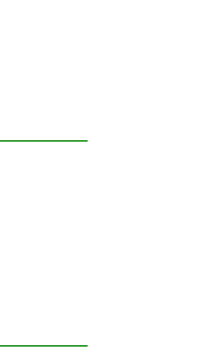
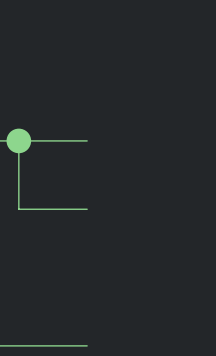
wire: none -> (18, 140) (18, 209) (87, 209)
junction: none -> (18, 140)

